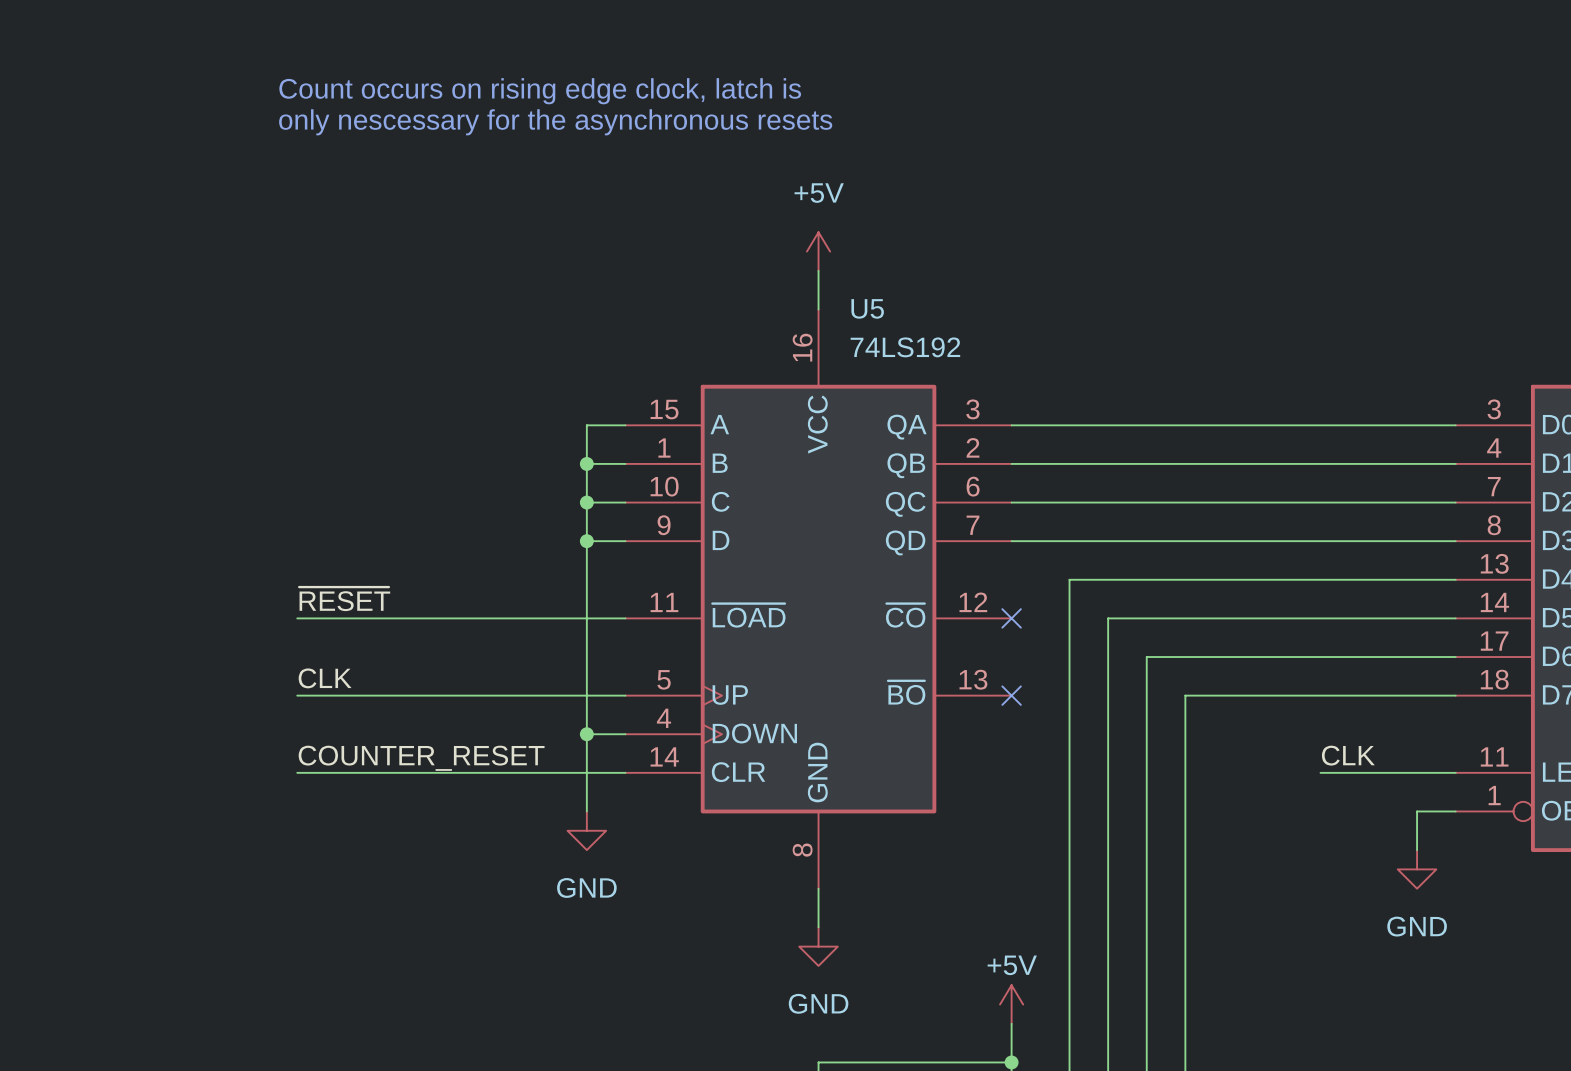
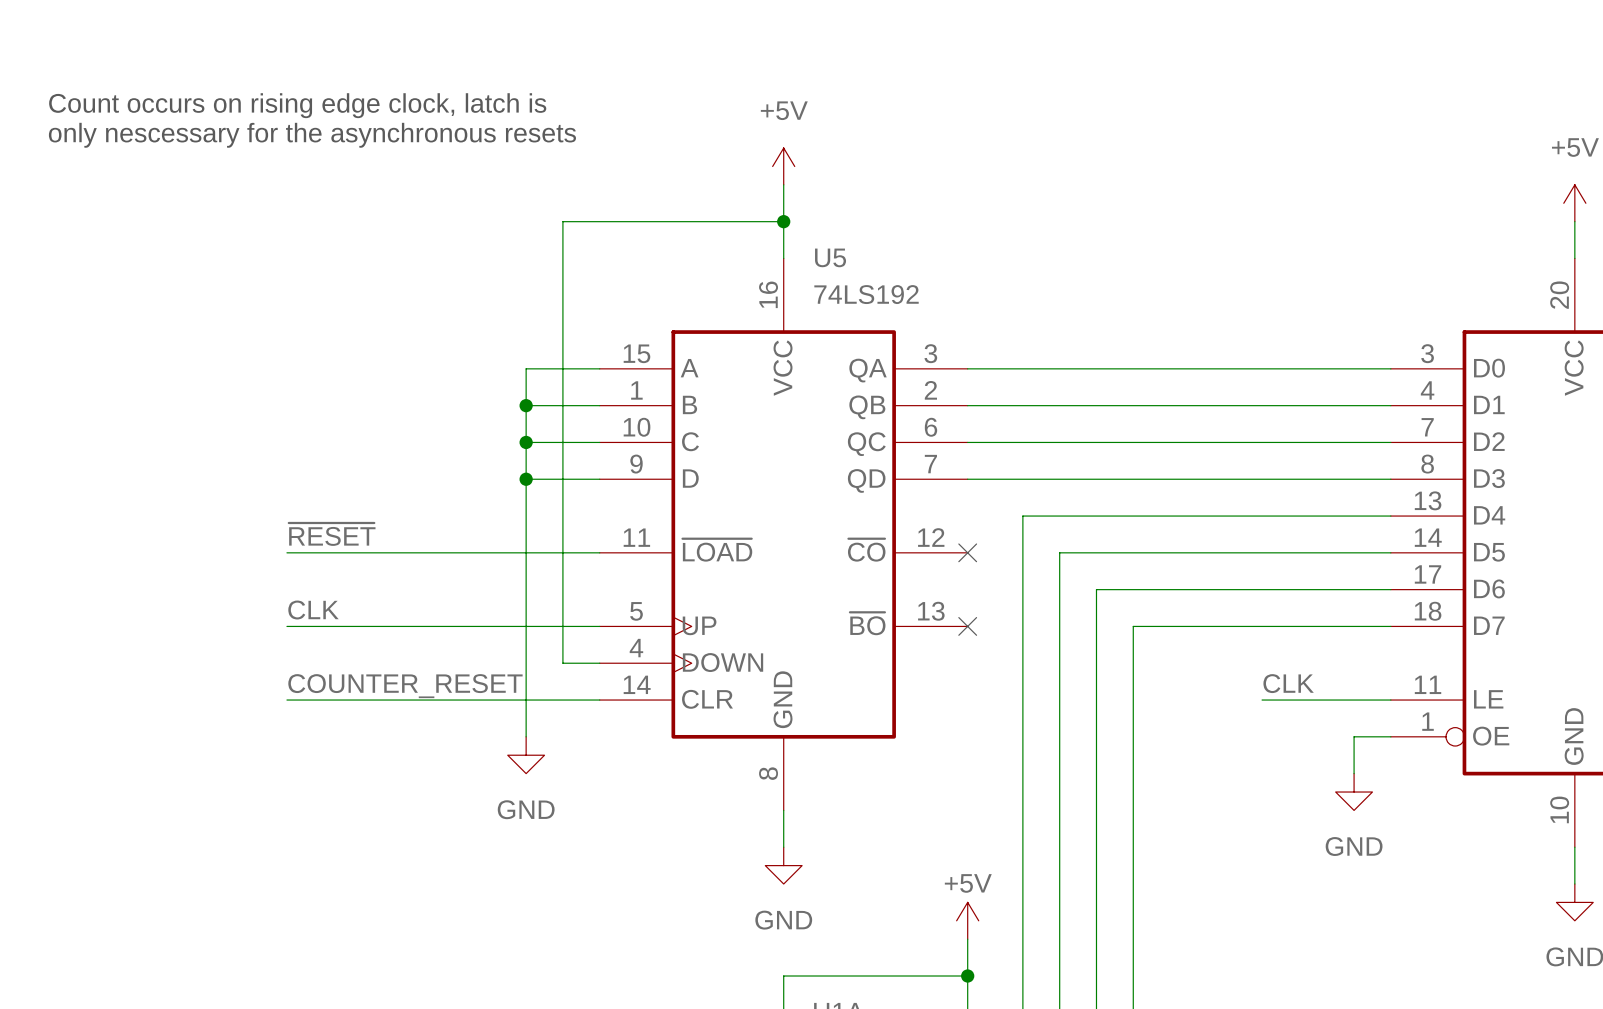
text position: Count occurs on rising edge clock, latch is (540, 91) -> Count occurs on rising edge clock, latch is (297, 105)
text position: only nescessary for the asynchronous resets (555, 122) -> only nescessary for the asynchronous resets (312, 135)
wire: none -> (783, 184) (783, 221) (562, 221) (562, 368) (526, 368) (526, 736)
power symbol position: +5V (818, 251) -> +5V (783, 166)
junction: none -> (783, 221)
wire: none -> (526, 405) (562, 405)
junction: none -> (526, 405)
junction: (586, 463) -> none
wire: none -> (526, 442) (562, 442)
junction: none -> (526, 442)
junction: (586, 502) -> none
wire: none -> (526, 479) (562, 479)
junction: none -> (526, 479)
junction: (586, 541) -> none
wire: (586, 734) (586, 811) -> none
junction: (586, 734) -> none
power symbol position: GND (586, 830) -> GND (526, 755)

